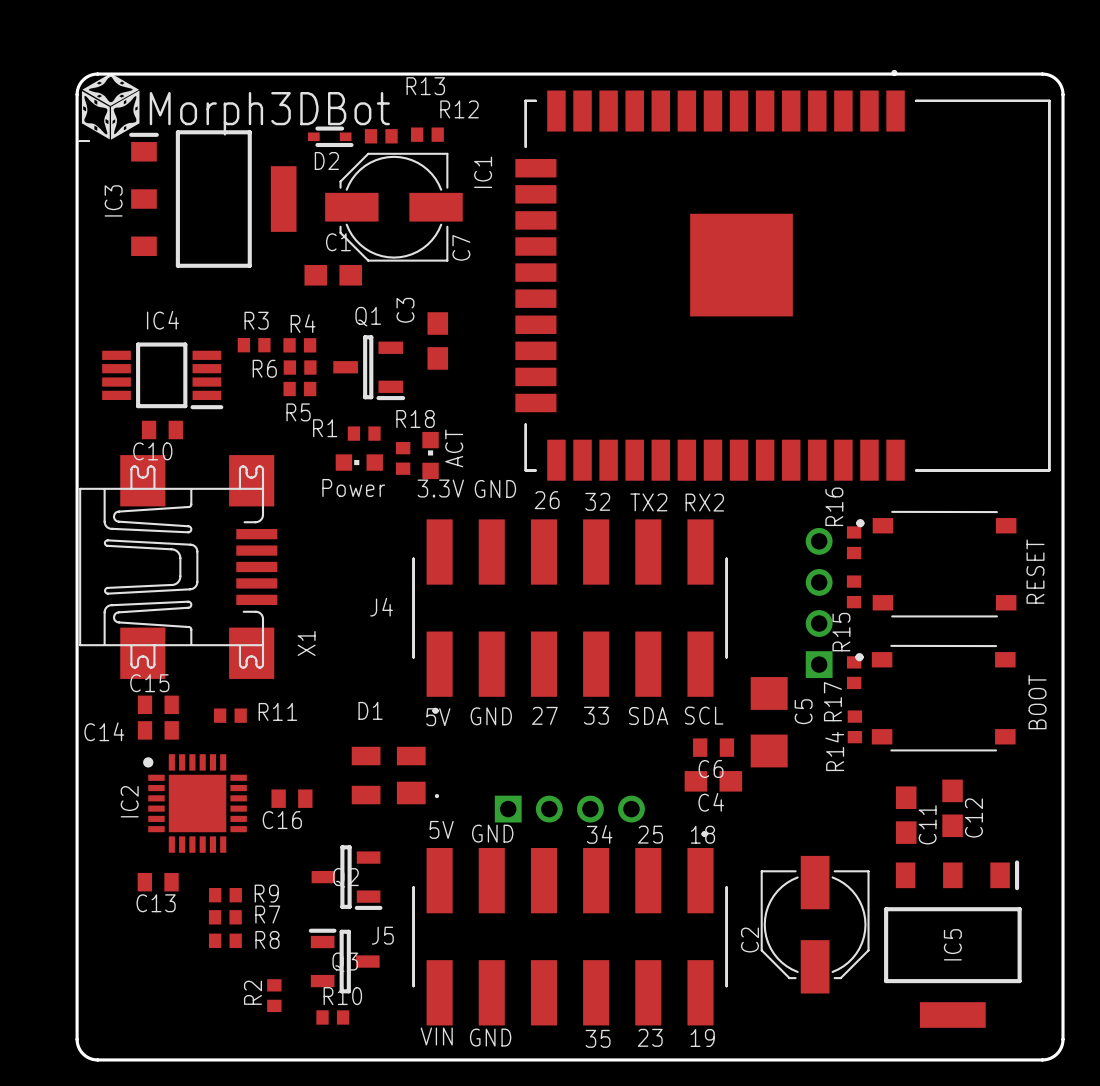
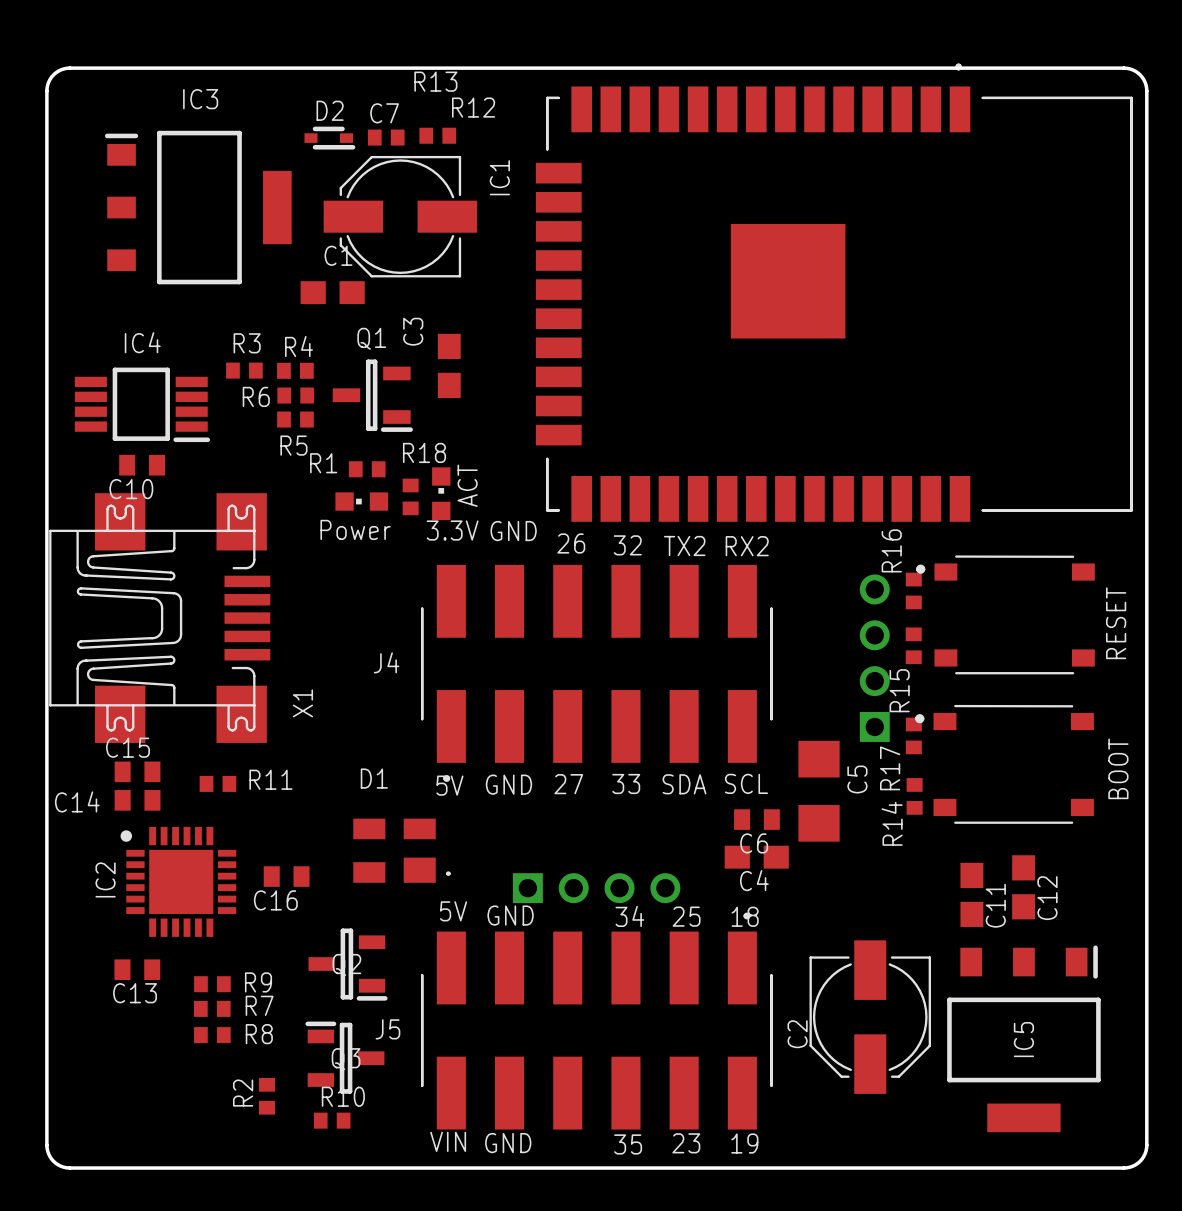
drawing: [81, 73, 140, 140] -> none
D2 name position: D2 (326, 160) -> D2 (330, 110)
IC3 name rotation: 0° (113, 200) -> 90° clockwise (200, 99)
IC3 name position: IC3 (113, 200) -> IC3 (200, 99)
C7 name rotation: 0° (461, 247) -> 90° clockwise (384, 113)
C7 name position: C7 (461, 247) -> C7 (384, 113)

